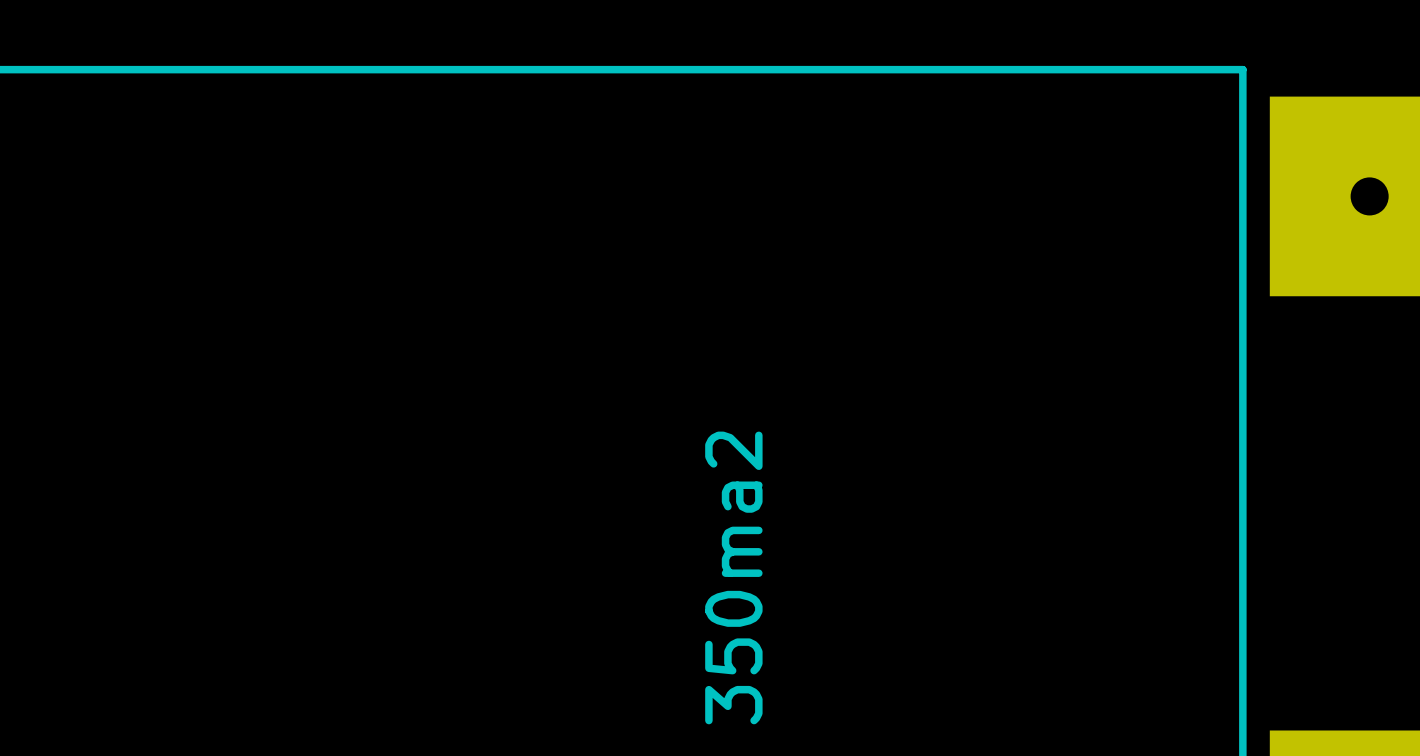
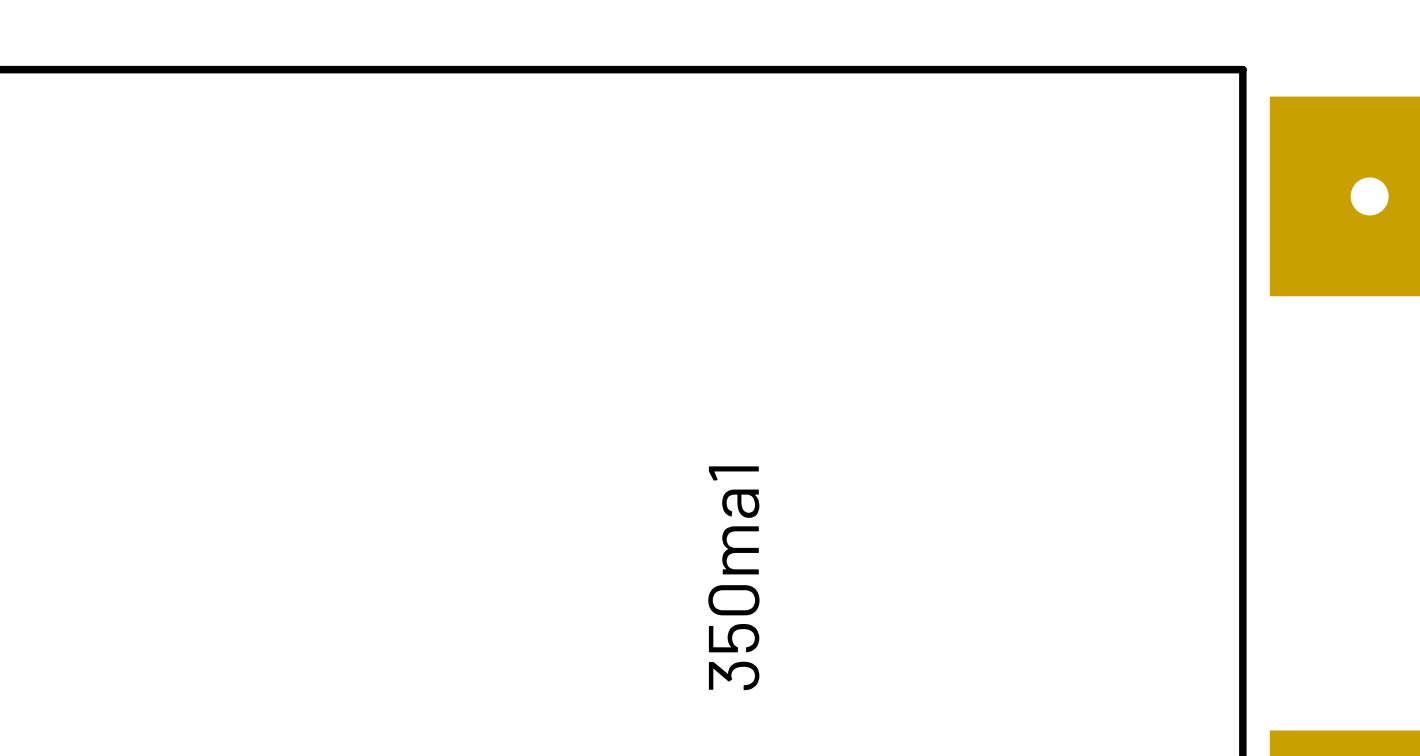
350ma2 name: 350ma2 (733, 577) -> 350ma1 (733, 578)

